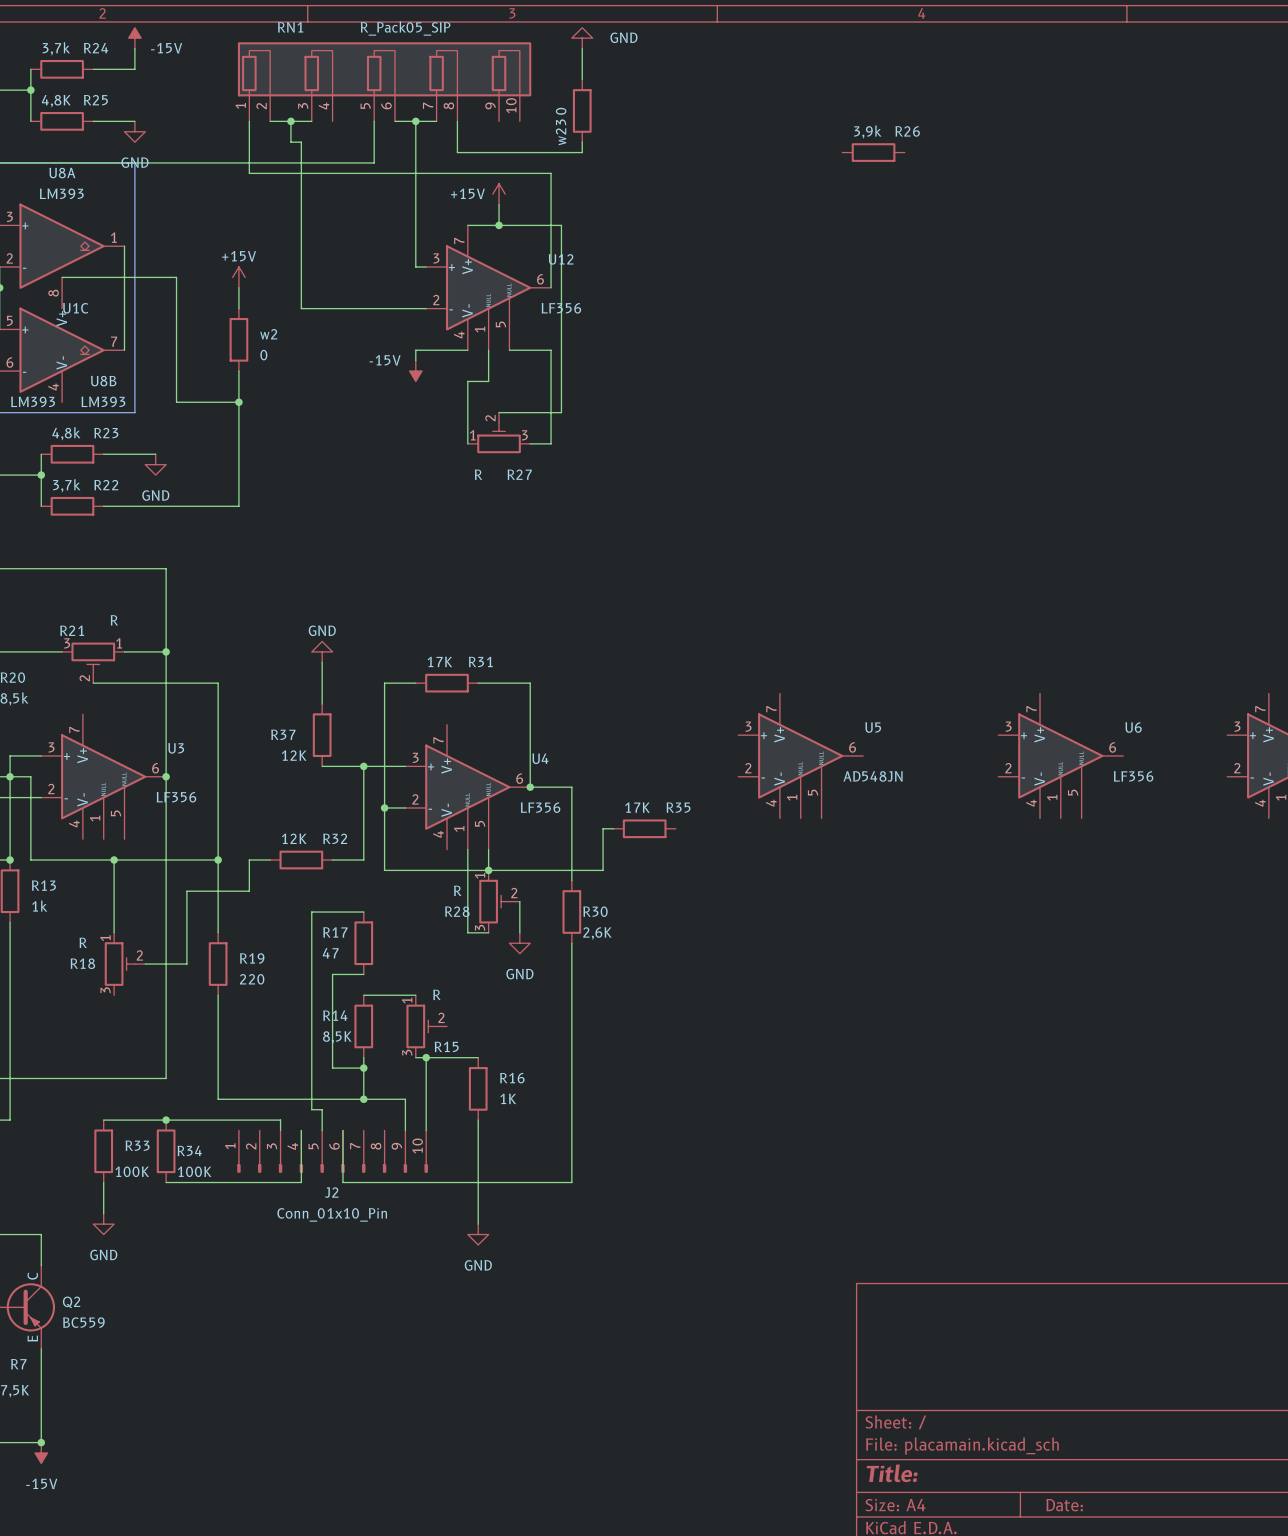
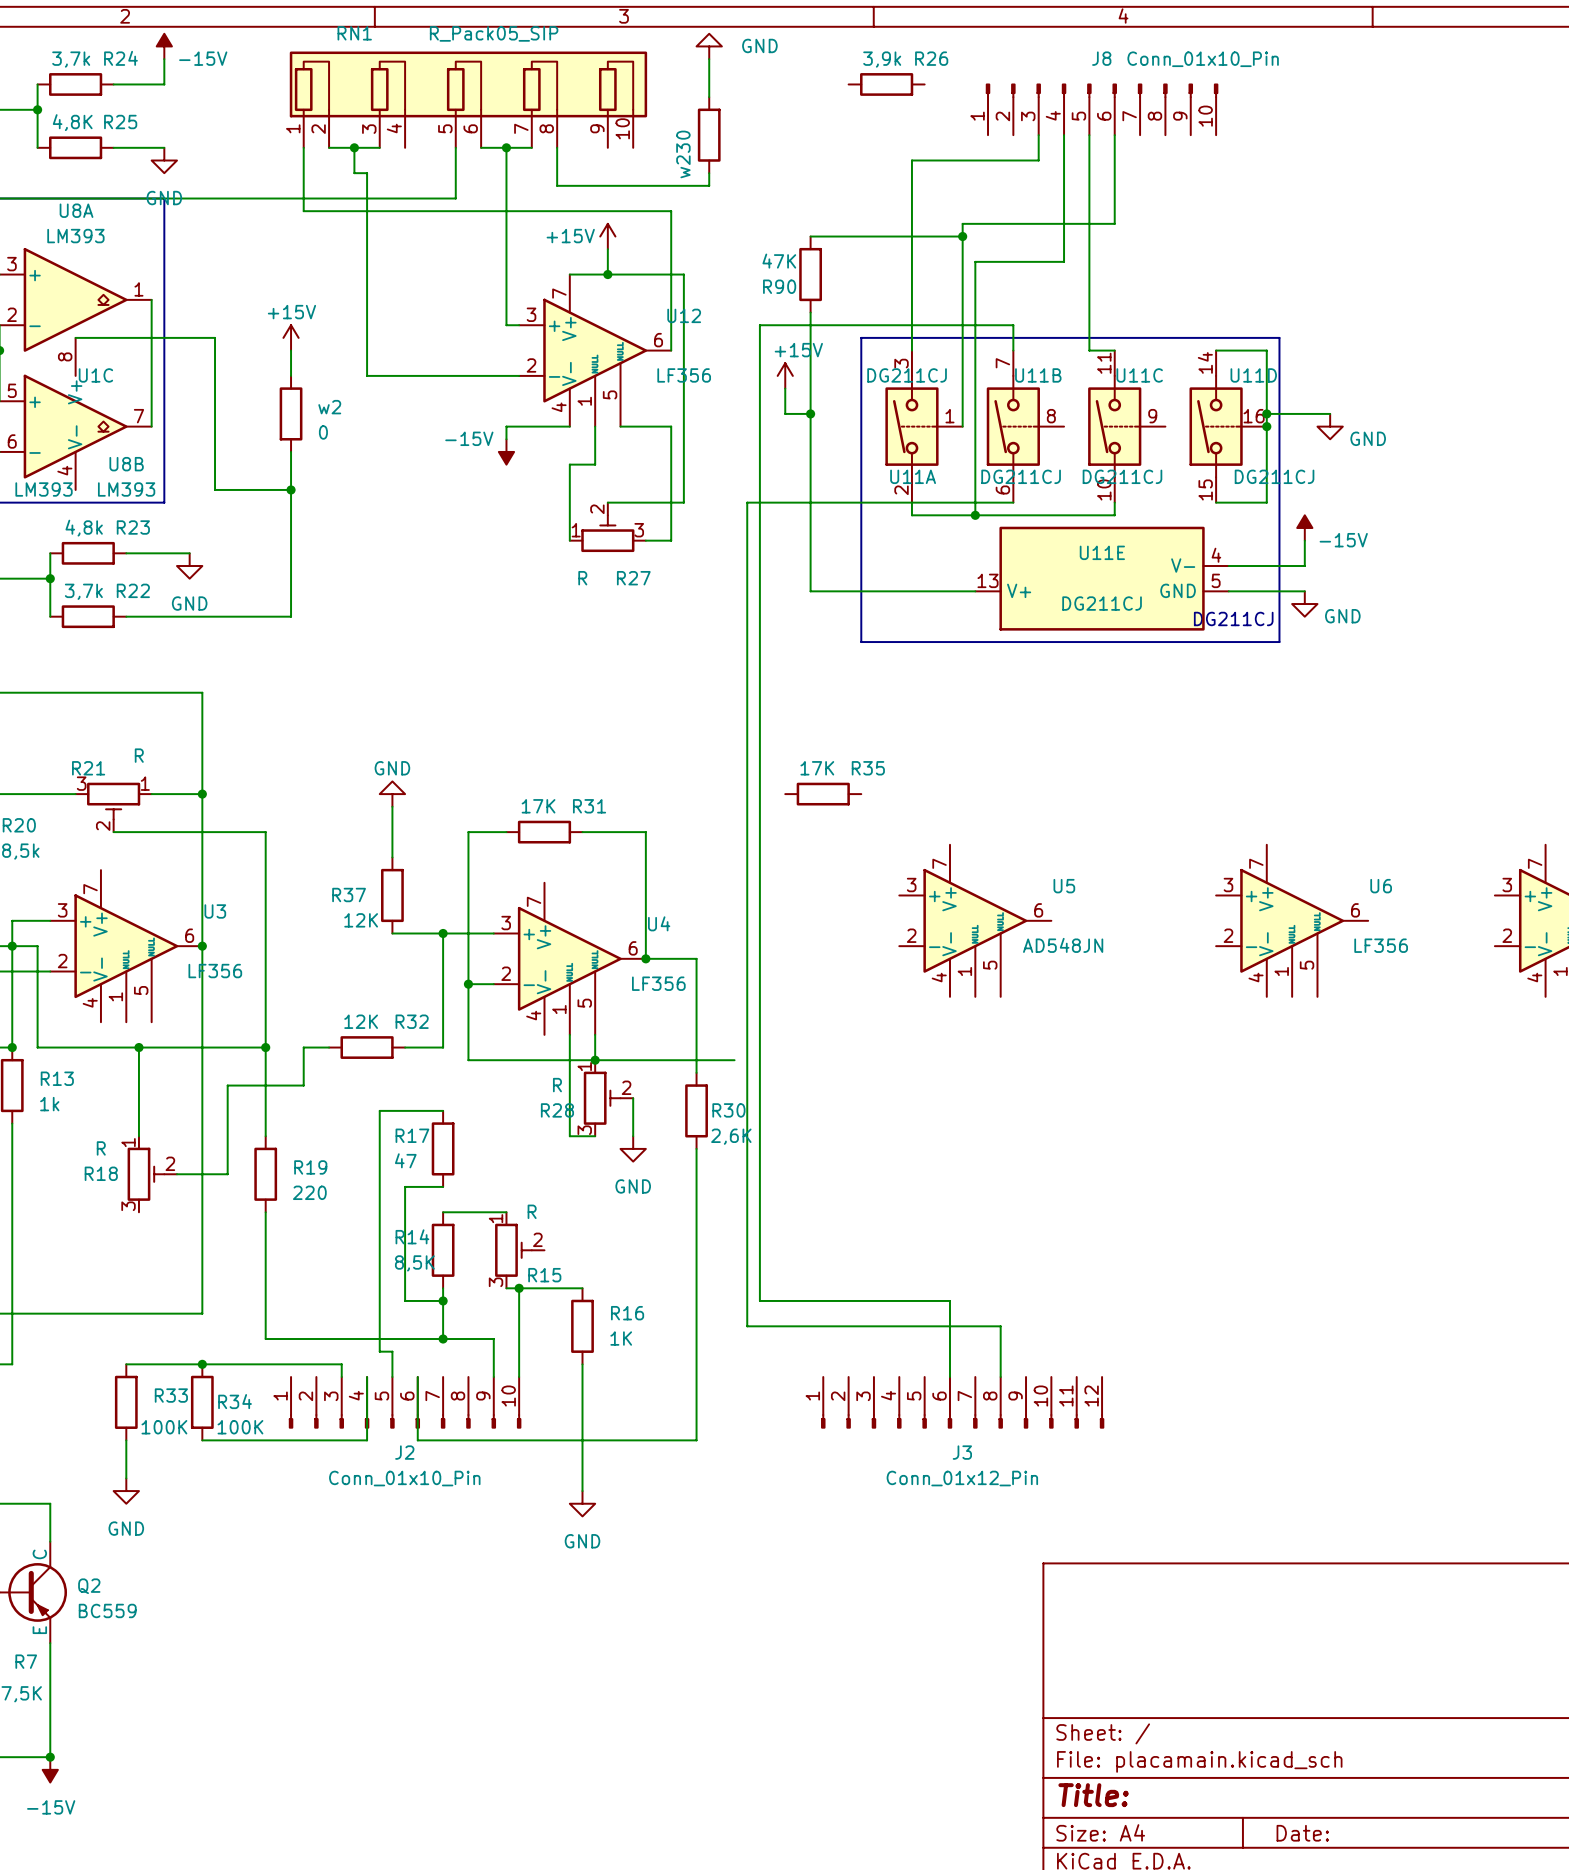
J8: none -> Conn_01x10_Pin (1102, 109)
wire: none -> (1038, 135) (1038, 160) (911, 160) (911, 350)
wire: none -> (1064, 135) (1064, 261) (975, 261) (975, 515)
wire: none -> (1089, 135) (1089, 350) (1114, 350)
wire: none -> (1114, 135) (1114, 223) (962, 223) (962, 426)
R26 position: (873, 152) -> (886, 84)
wire: none -> (810, 236) (962, 236)
junction: none -> (962, 236)
R90: none -> 47K (810, 274)
wire: none -> (810, 312) (810, 591) (975, 591)
line: none -> (861, 337) (1279, 337) (1279, 642) (861, 642) (861, 337)
wire: none -> (1013, 350) (1013, 325) (759, 325) (759, 1300) (949, 1300) (949, 1377)
wire: none -> (1216, 350) (1266, 350) (1266, 502) (1216, 502)
power symbol: none -> +15V (785, 375)
wire: none -> (785, 388) (785, 413) (810, 413)
junction: none -> (810, 413)
wire: none -> (1266, 413) (1330, 413)
junction: none -> (1266, 413)
U11A: none -> DG211CJ (924, 426)
U11B: none -> DG211CJ (1025, 426)
U11C: none -> DG211CJ (1126, 426)
U11D: none -> DG211CJ (1228, 426)
junction: none -> (1266, 426)
power symbol: none -> GND (1330, 426)
wire: none -> (911, 502) (911, 515) (1114, 515) (1114, 502)
wire: none -> (1013, 502) (747, 502) (747, 1326) (1000, 1326) (1000, 1377)
junction: none -> (975, 515)
power symbol: none -> -15V (1304, 527)
wire: none -> (1304, 540) (1304, 566) (1228, 566)
U11E: none -> DG211CJ (1102, 578)
wire: none -> (1228, 591) (1304, 591)
power symbol: none -> GND (1304, 604)
text: none -> DG211CJ (1233, 618)
wire: (613, 828) (603, 828) (603, 870) -> none
R35 position: (644, 828) -> (823, 794)
J3: none -> Conn_01x12_Pin (962, 1402)

